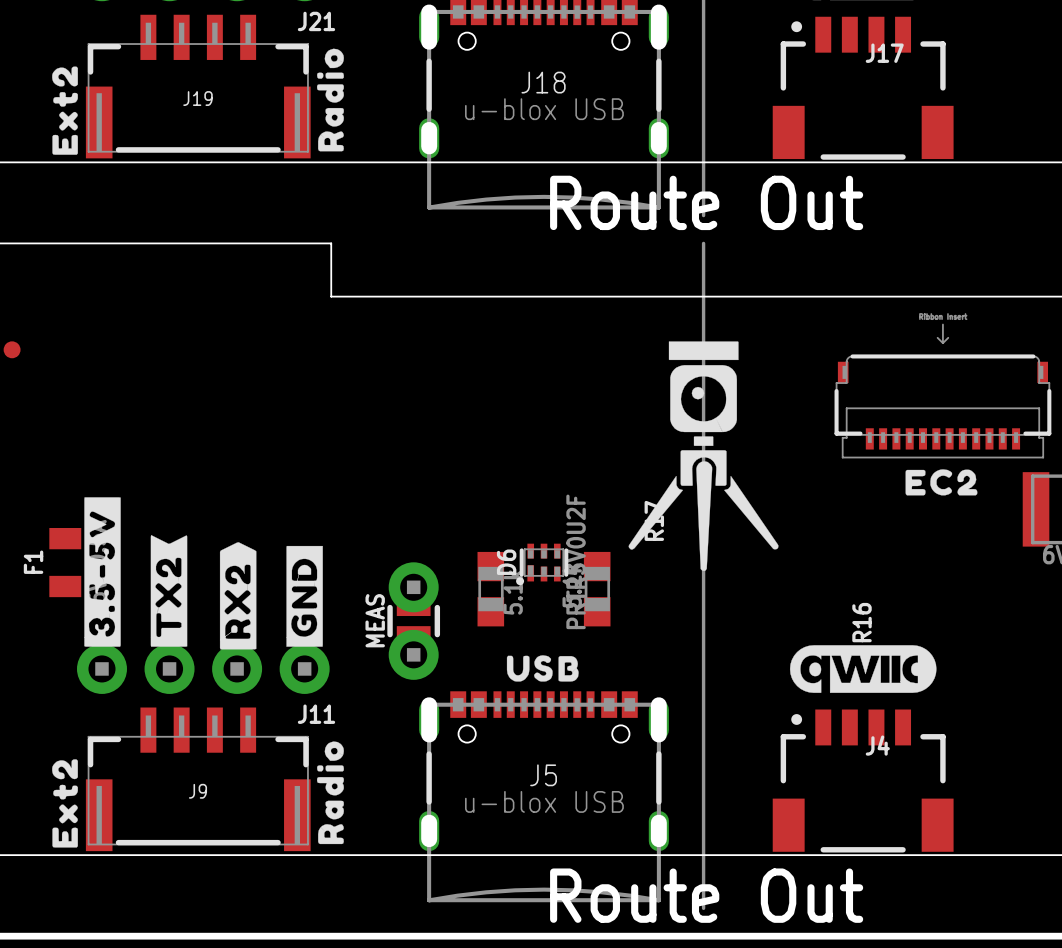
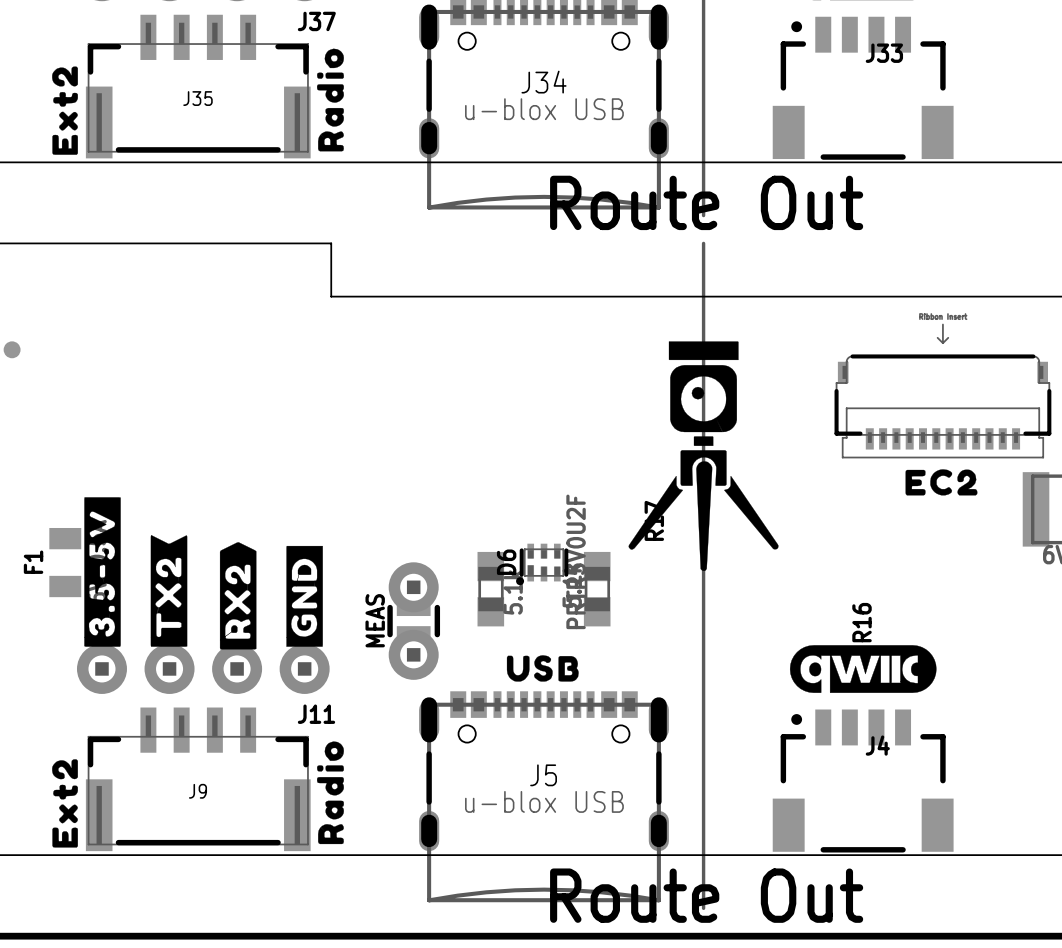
J21 name: J21 (316, 21) -> J37 (316, 21)
J17 name: J17 (884, 53) -> J33 (884, 53)
J18 name: J18 (543, 82) -> J34 (544, 82)
J19 name: J19 (197, 98) -> J35 (197, 98)

